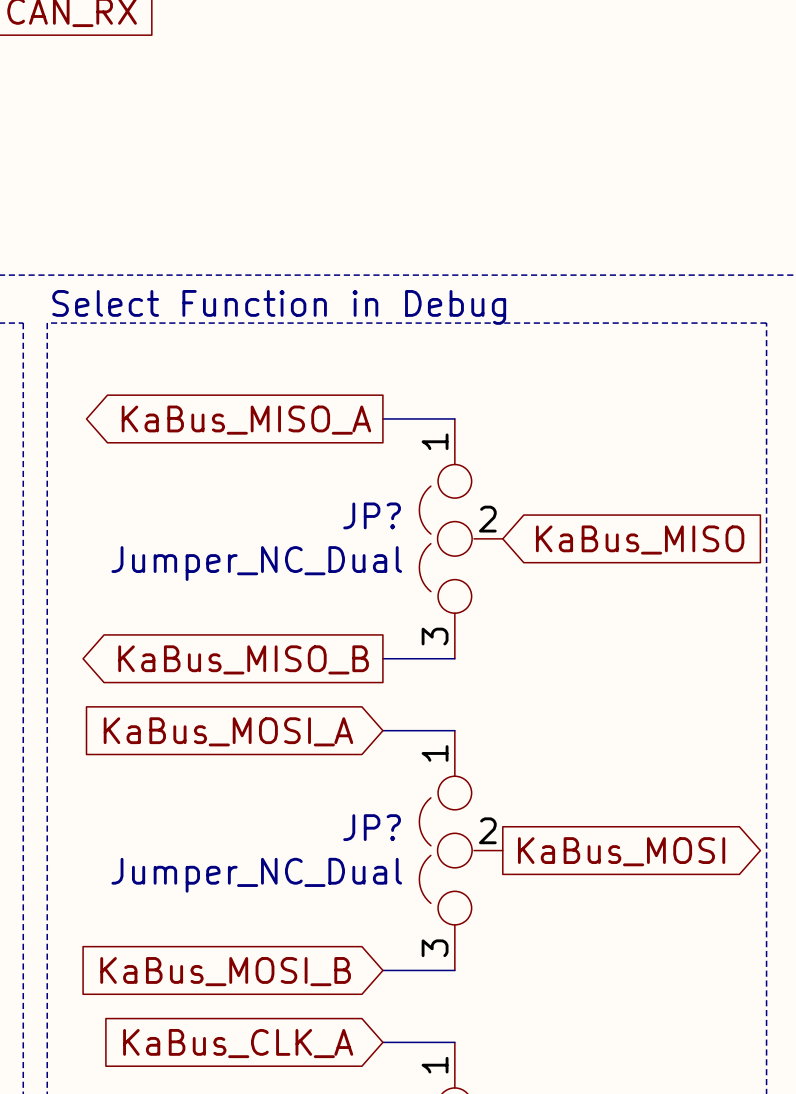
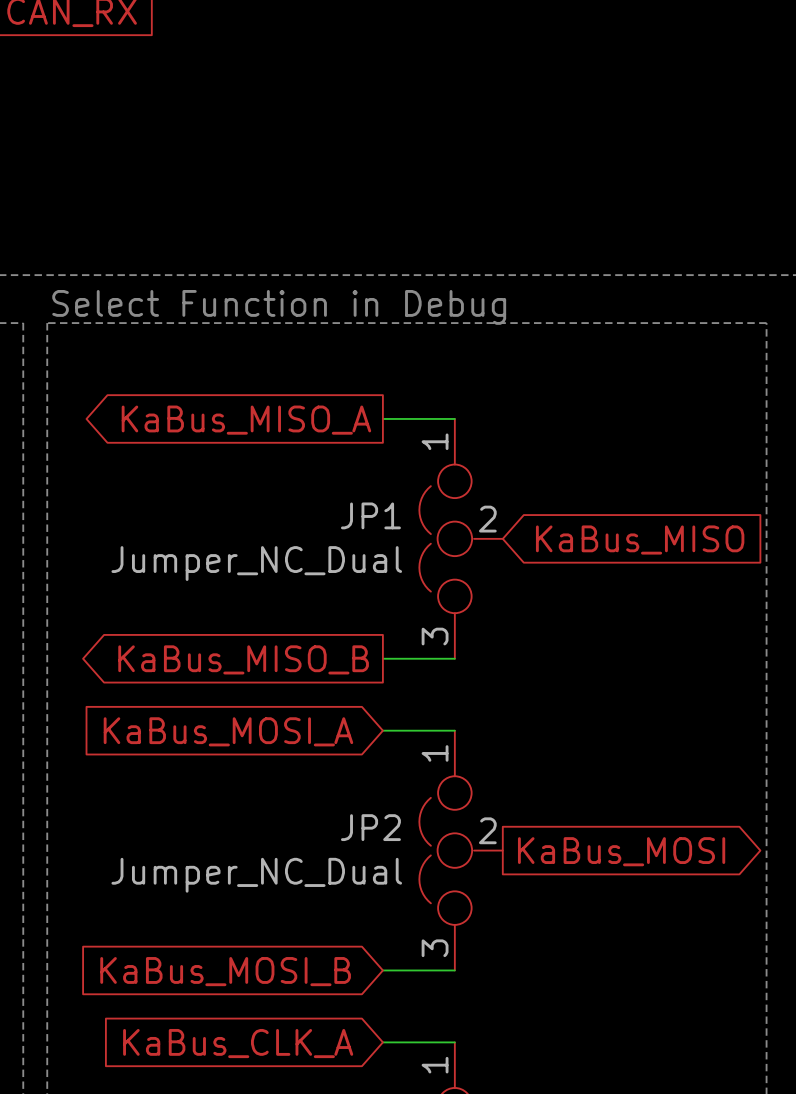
JP? name: JP? (372, 515) -> JP1 (370, 515)
JP? name: JP? (372, 827) -> JP2 (370, 827)

